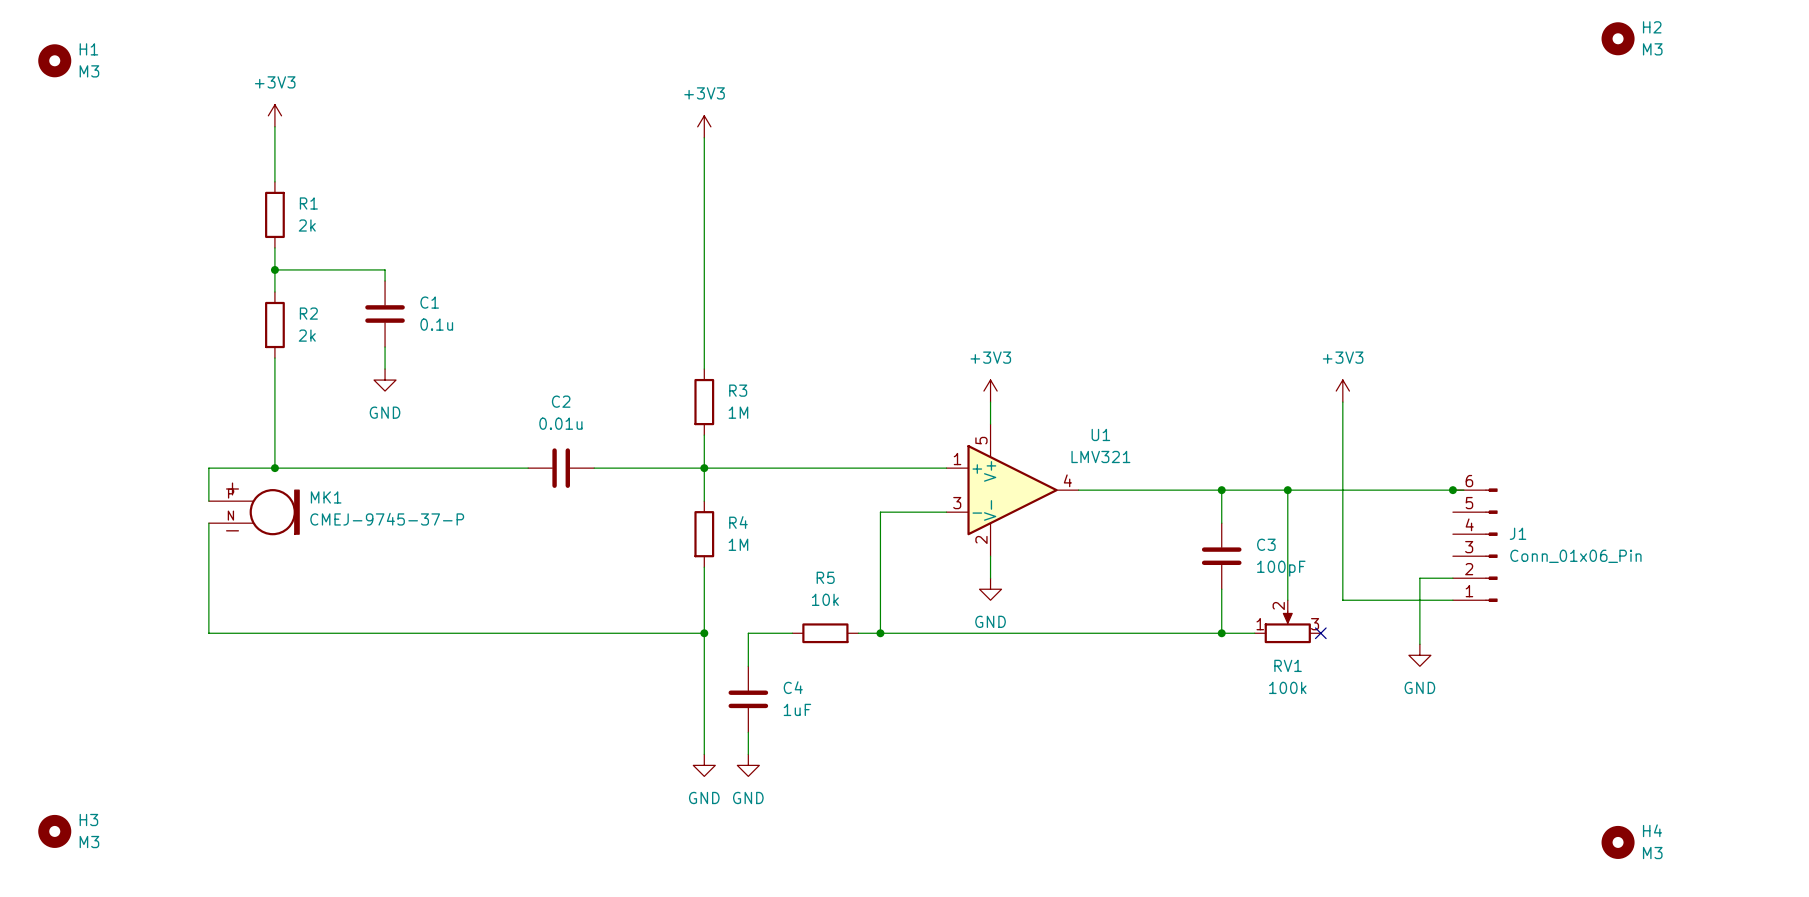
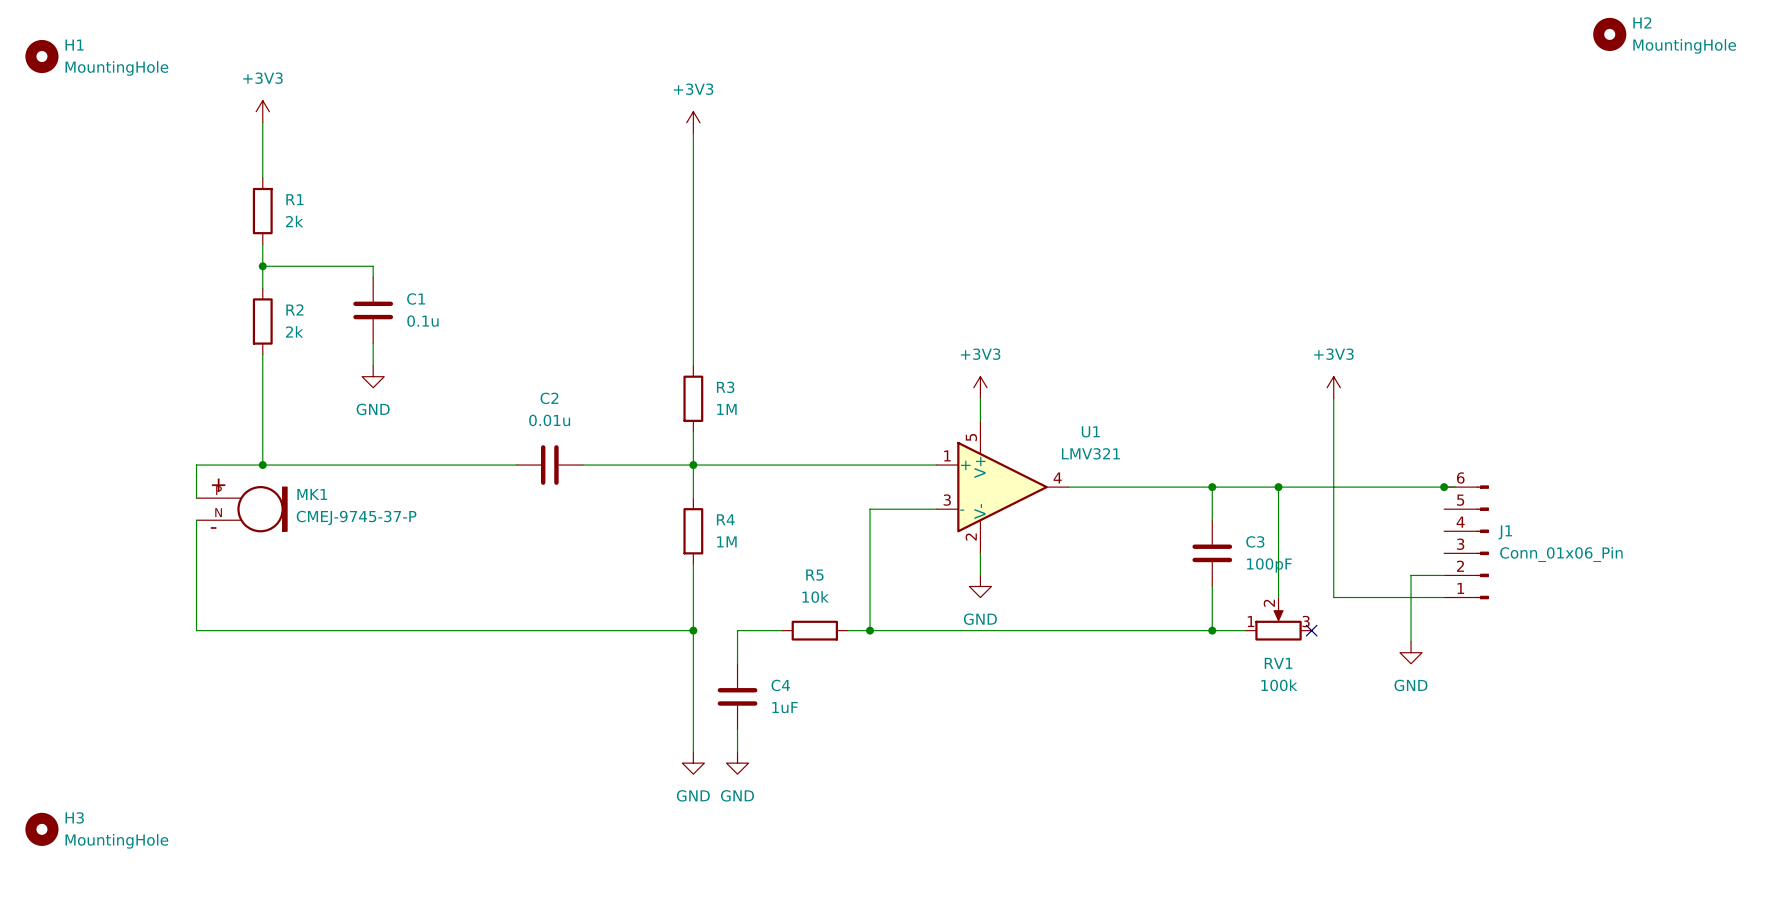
H2 value: M3 (1652, 49) -> MountingHole (1684, 46)
H1 value: M3 (89, 71) -> MountingHole (116, 68)
H3 value: M3 (89, 842) -> MountingHole (116, 841)
H4: M3 (1618, 842) -> none

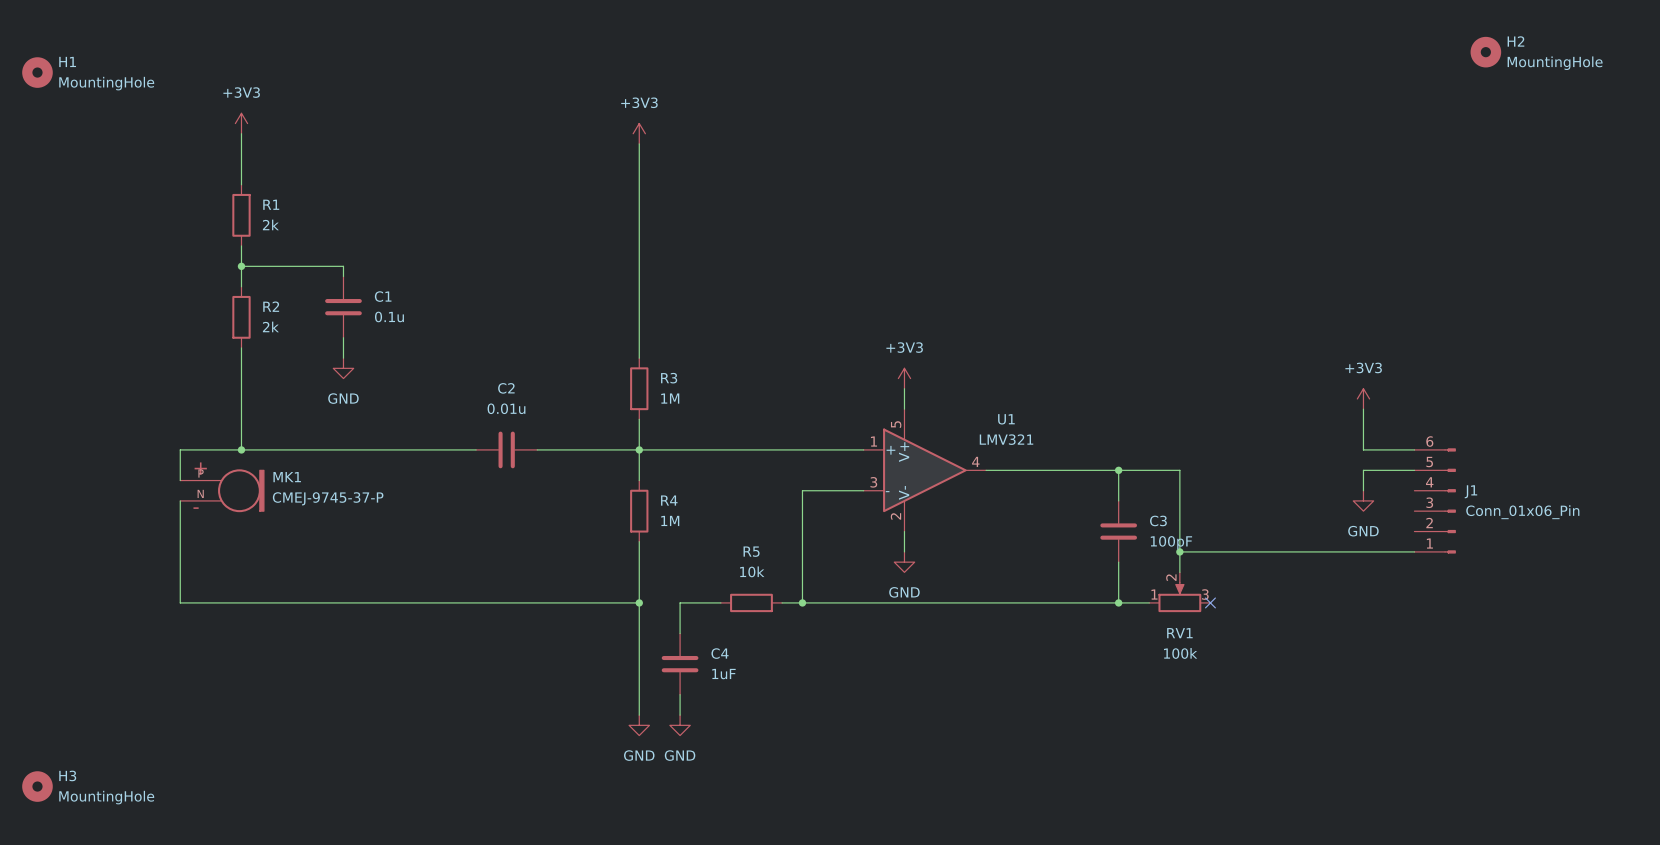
power symbol position: +3V3 (1333, 387) -> +3V3 (1363, 398)
wire: (1333, 398) (1333, 597) (1444, 597) -> none
wire: none -> (1363, 409) (1363, 449) (1414, 449)
wire: (1278, 487) (1455, 487) -> none
junction: (1278, 487) -> none
junction: (1444, 487) -> none
wire: none -> (1414, 470) (1363, 470) (1363, 490)
J1 position: (1466, 542) -> (1435, 500)
junction: none -> (1179, 551)
wire: (1411, 575) (1411, 641) -> (1302, 551) (1179, 551)
wire: none -> (1332, 551) (1414, 551)
power symbol position: GND (1411, 652) -> GND (1363, 500)

